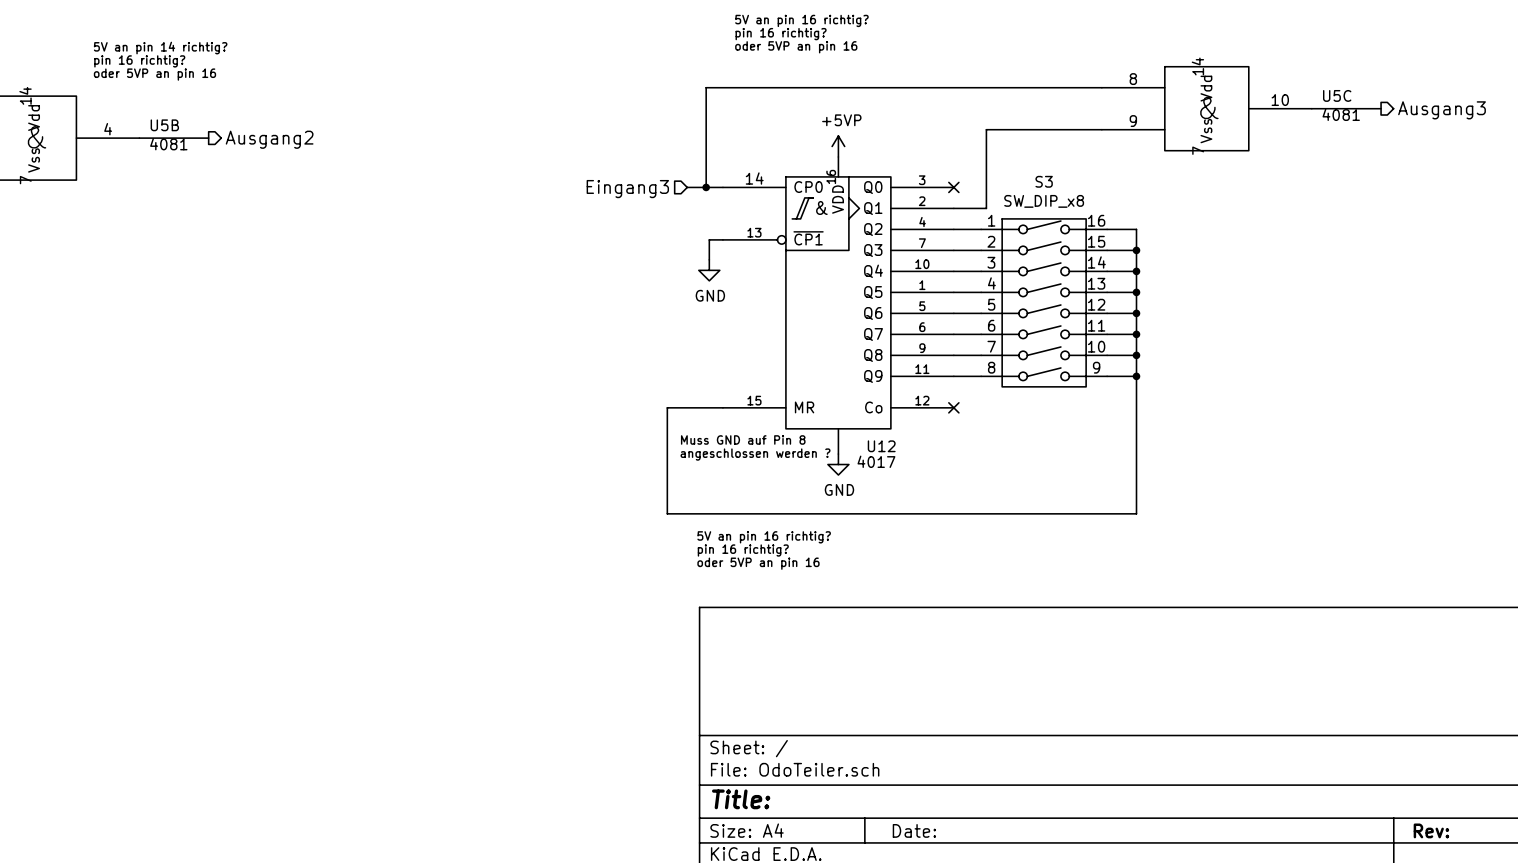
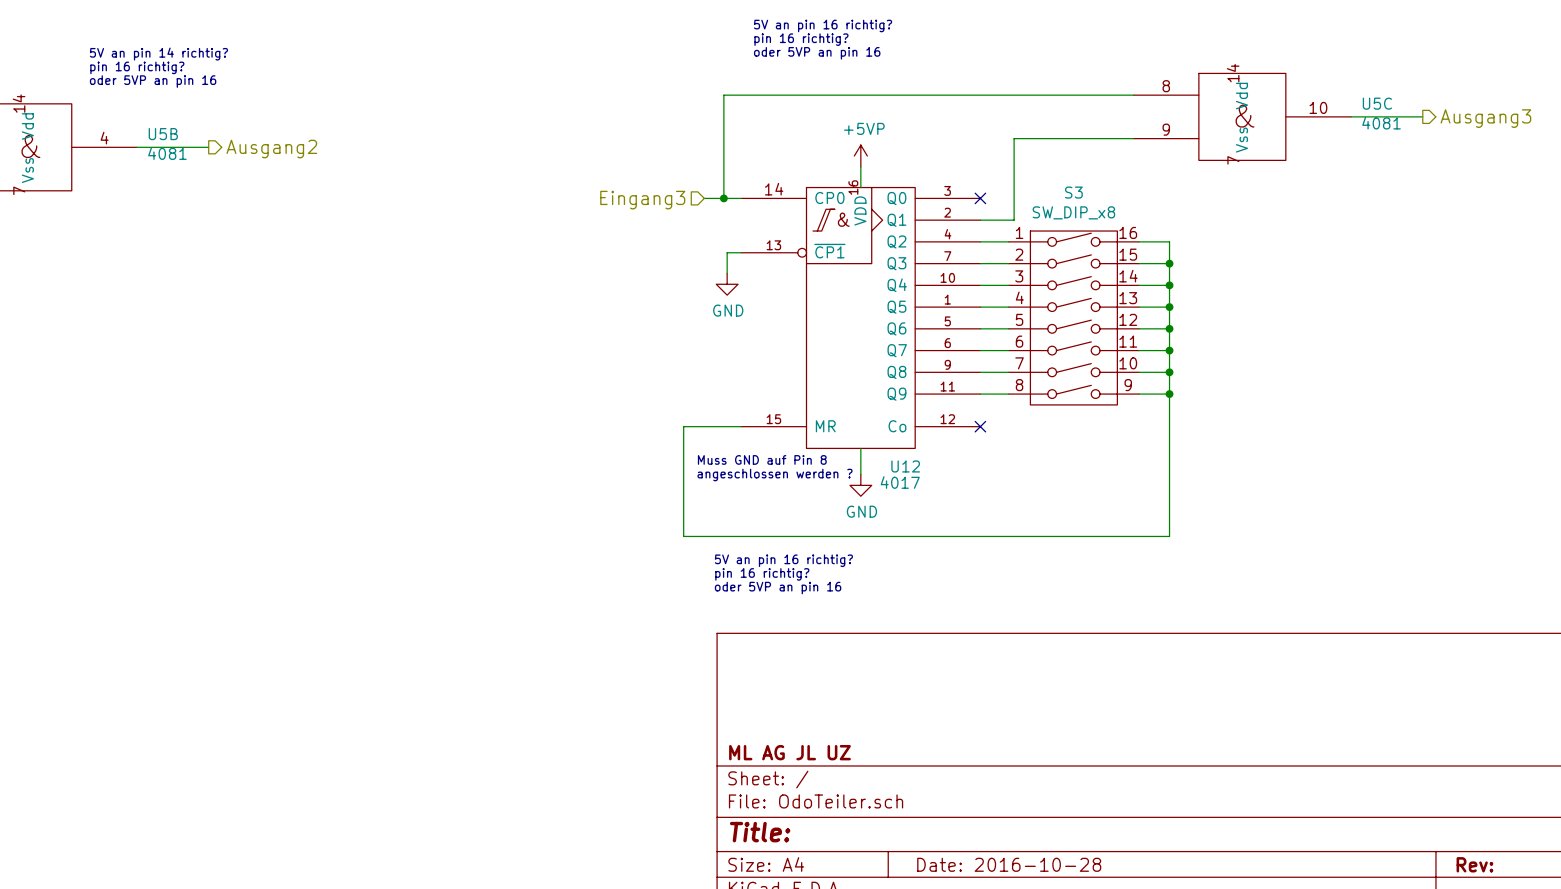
title block: none -> ML AG JL UZ (789, 752)
title block: Date: (914, 830) -> Date: 2016-10-28 (1009, 864)

